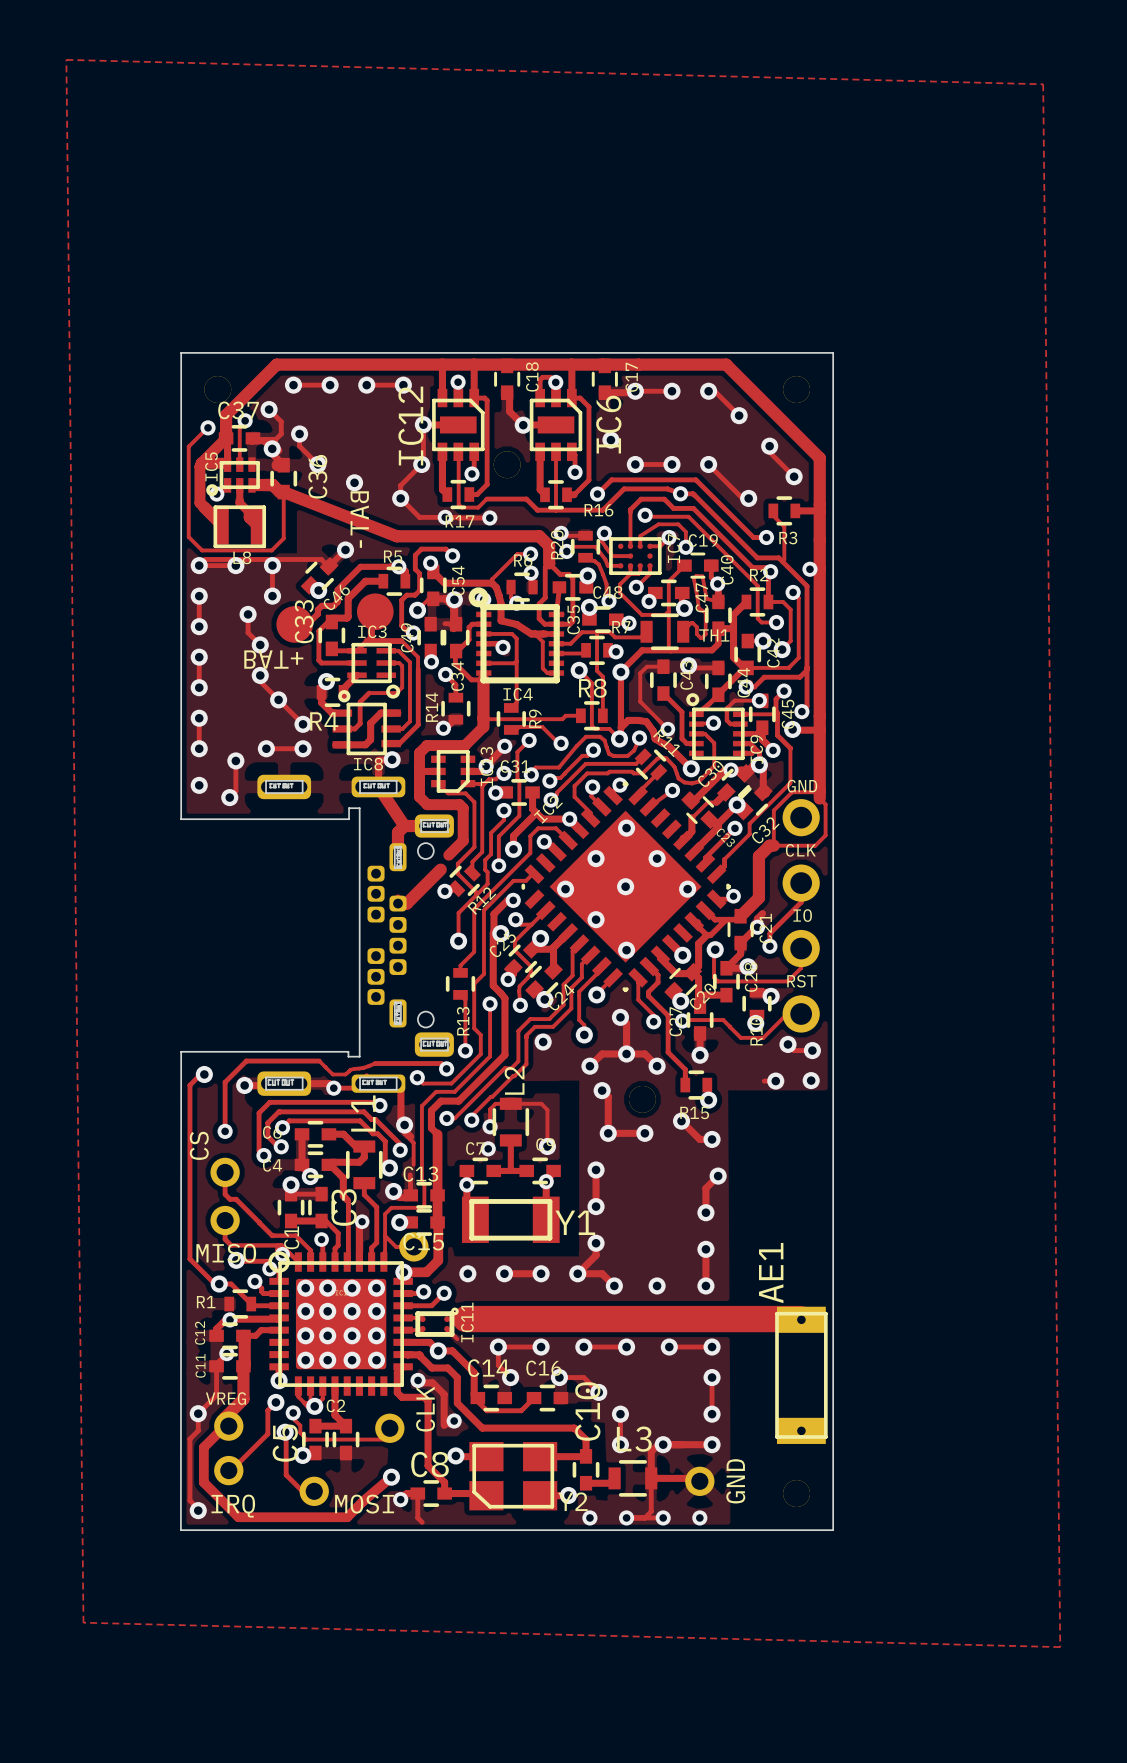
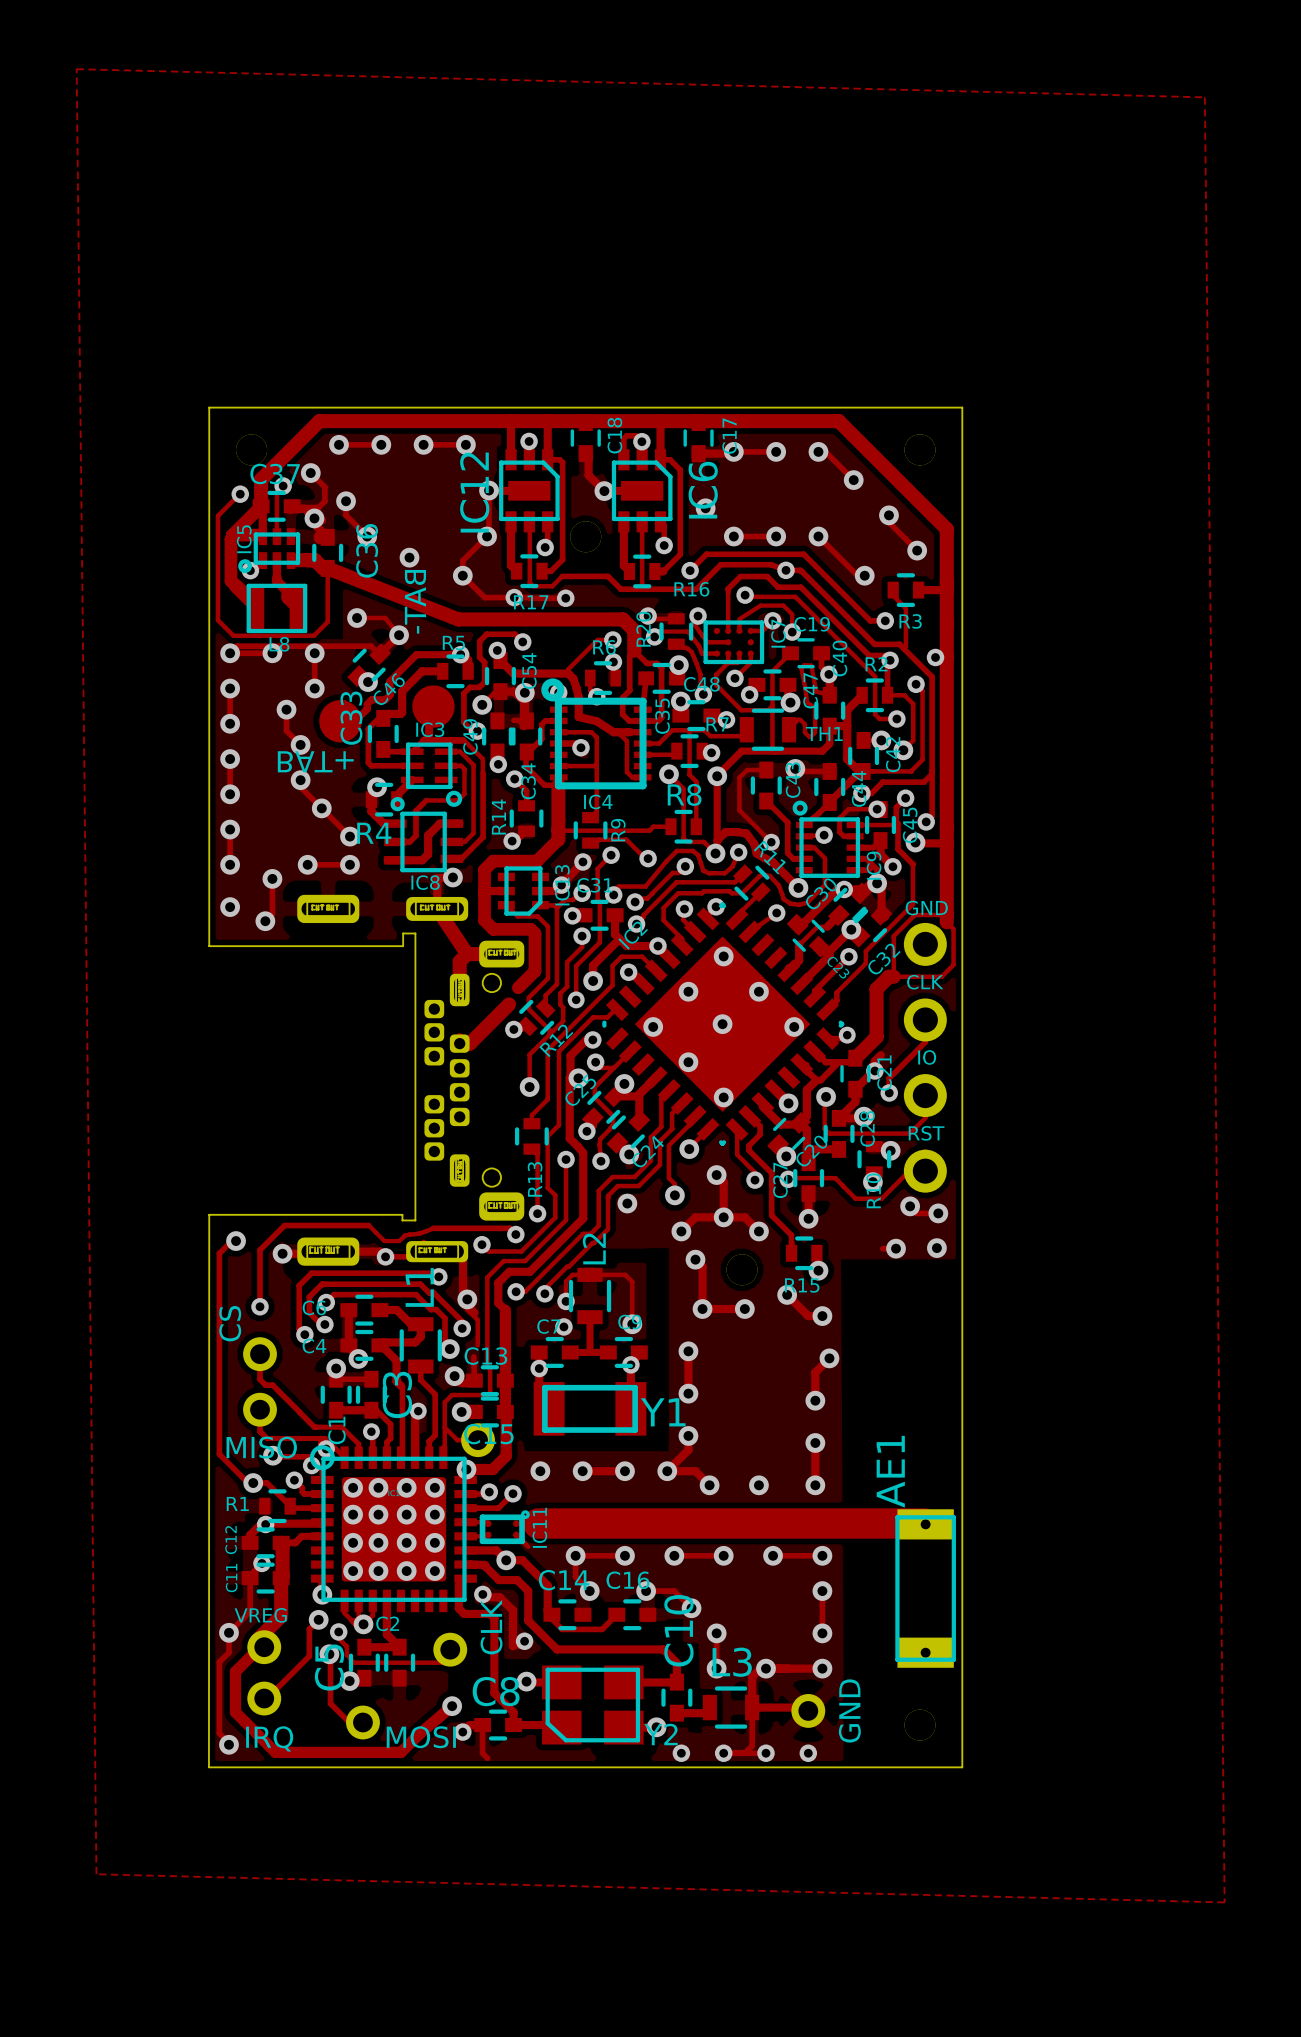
track: none -> (357, 618) (385, 618) (399, 635)
via: none -> (357, 618)

